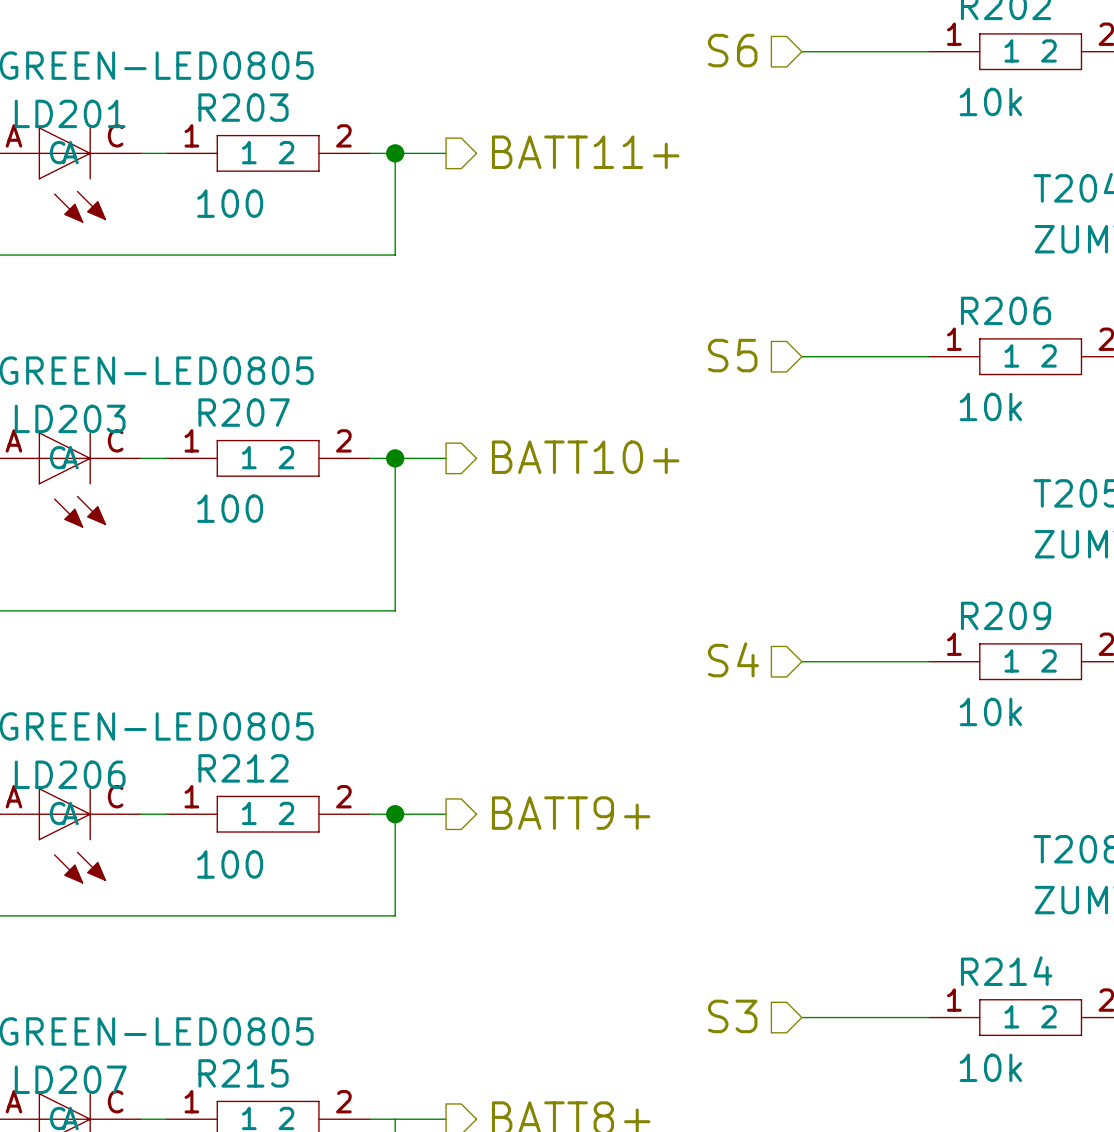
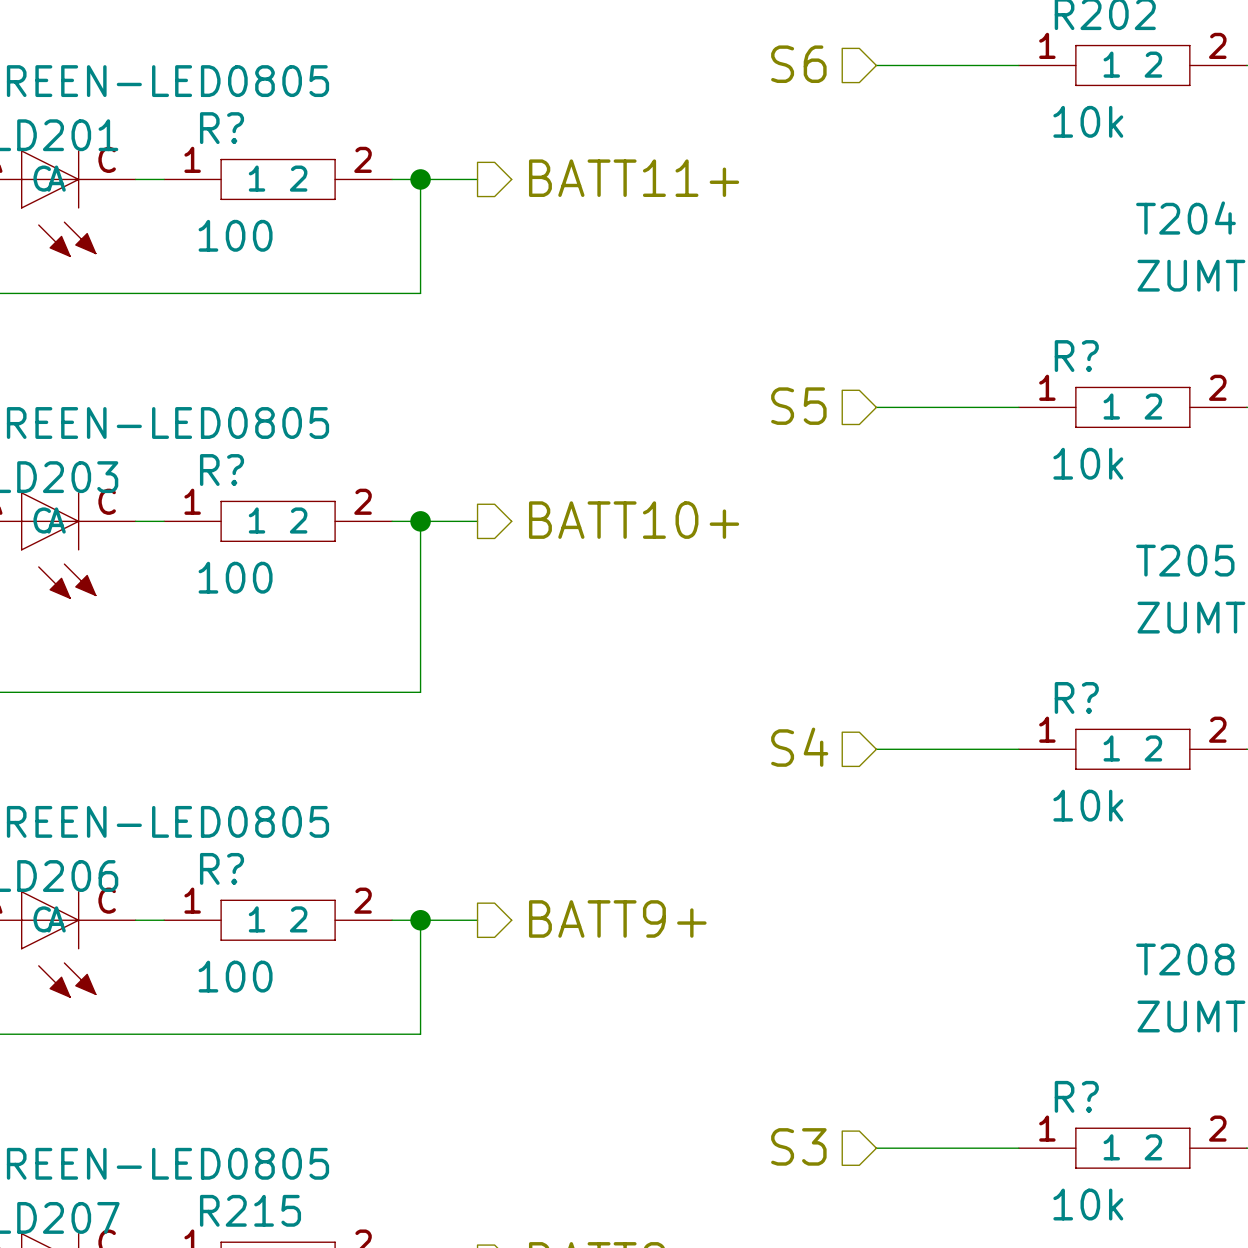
R203 name: R203 (243, 107) -> R? (222, 128)
R206 name: R206 (1006, 310) -> R? (1076, 356)
R207 name: R207 (244, 412) -> R? (222, 470)
R209 name: R209 (1006, 615) -> R? (1076, 697)
R212 name: R212 (243, 768) -> R? (222, 868)
R214 name: R214 (1006, 971) -> R? (1076, 1096)

